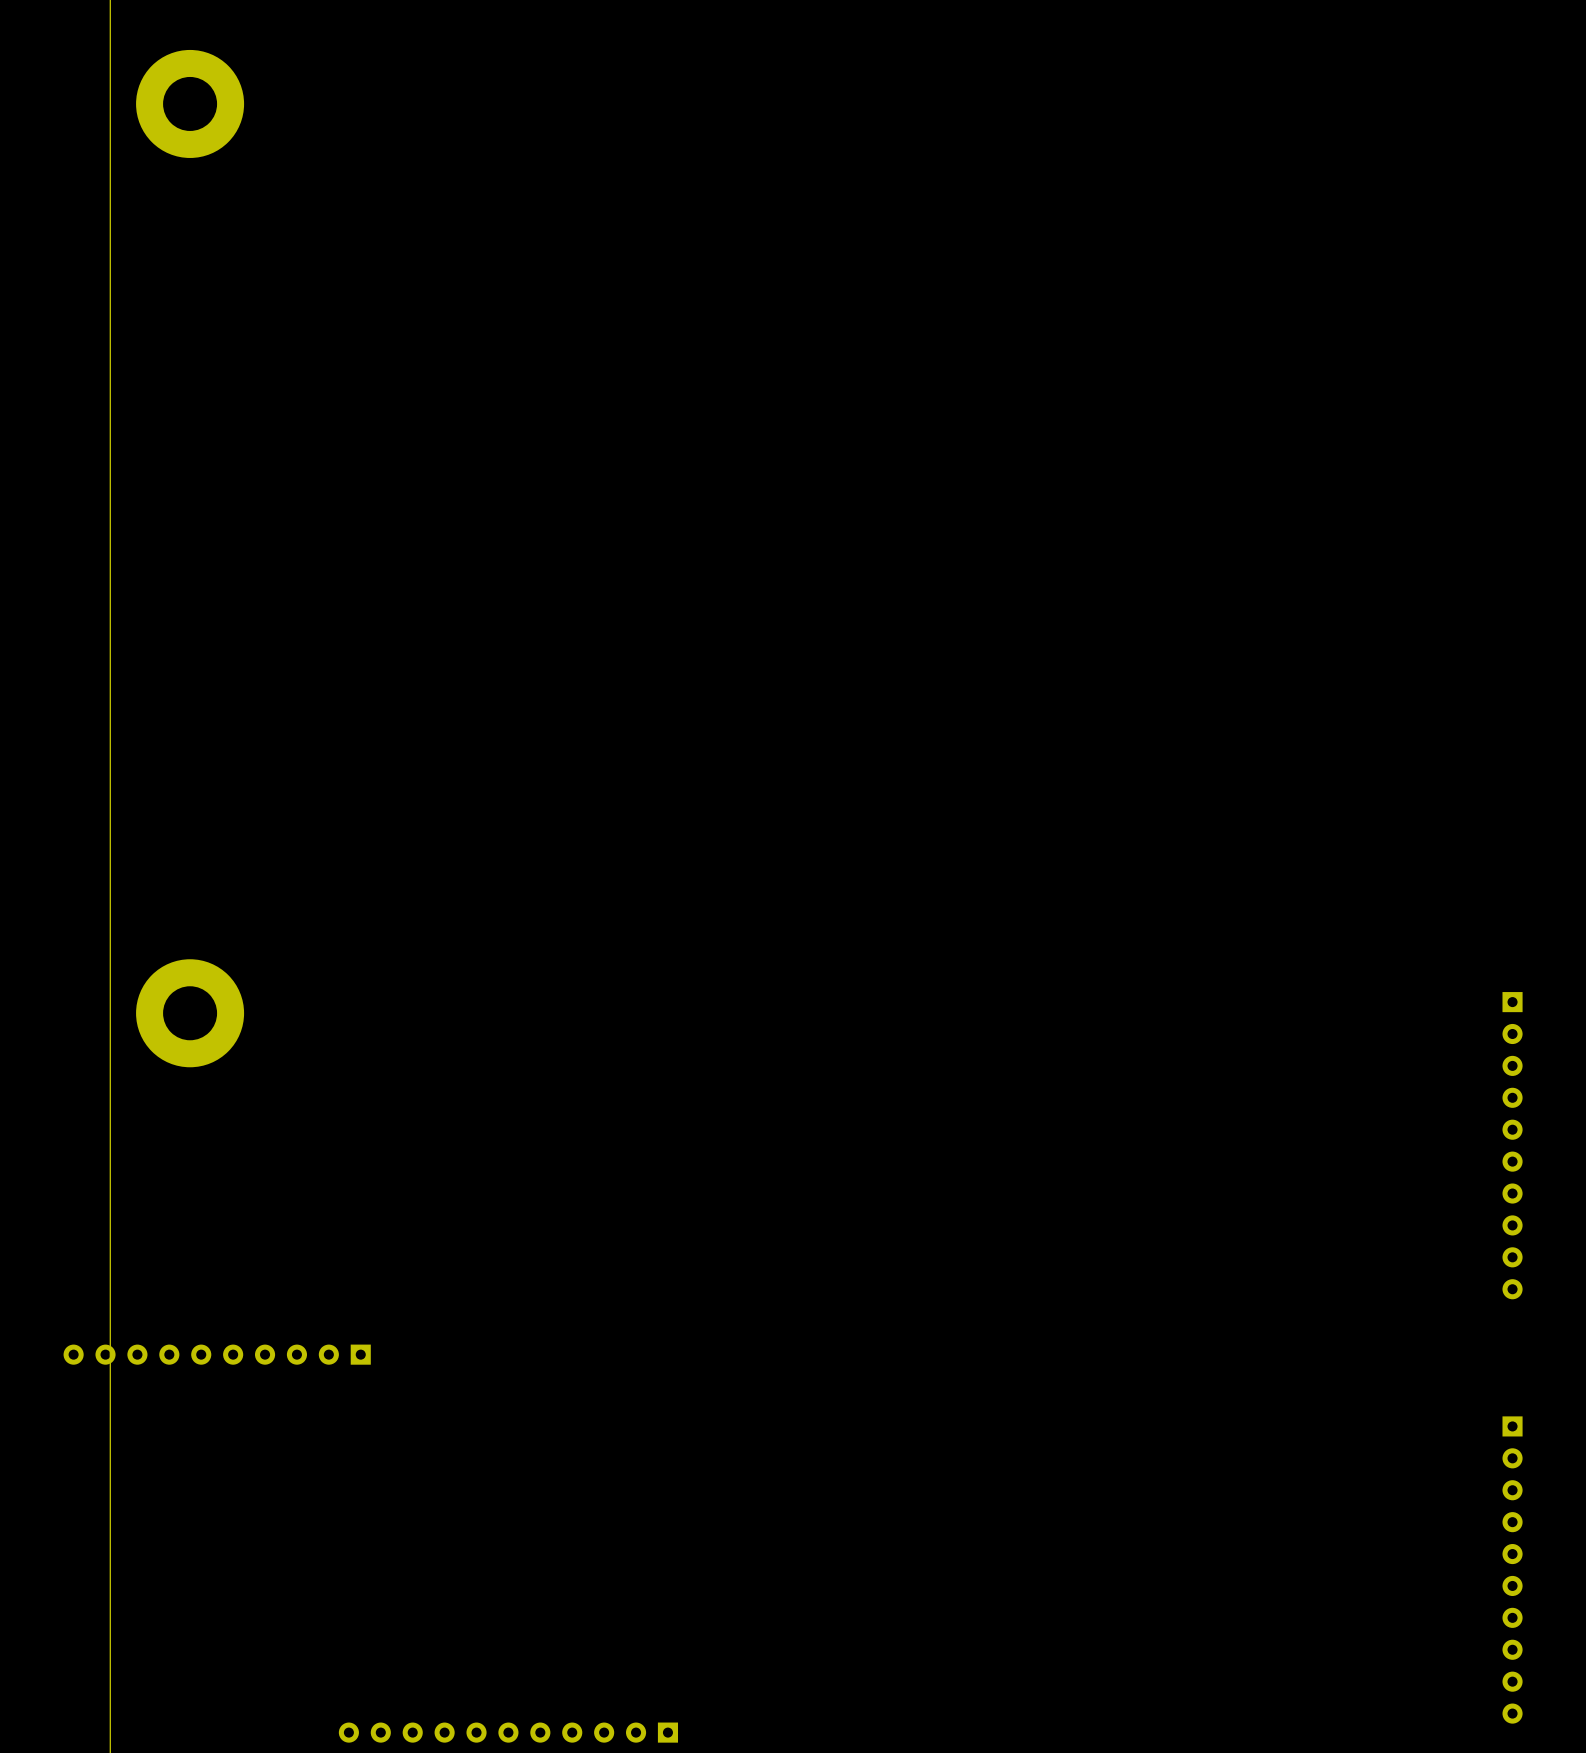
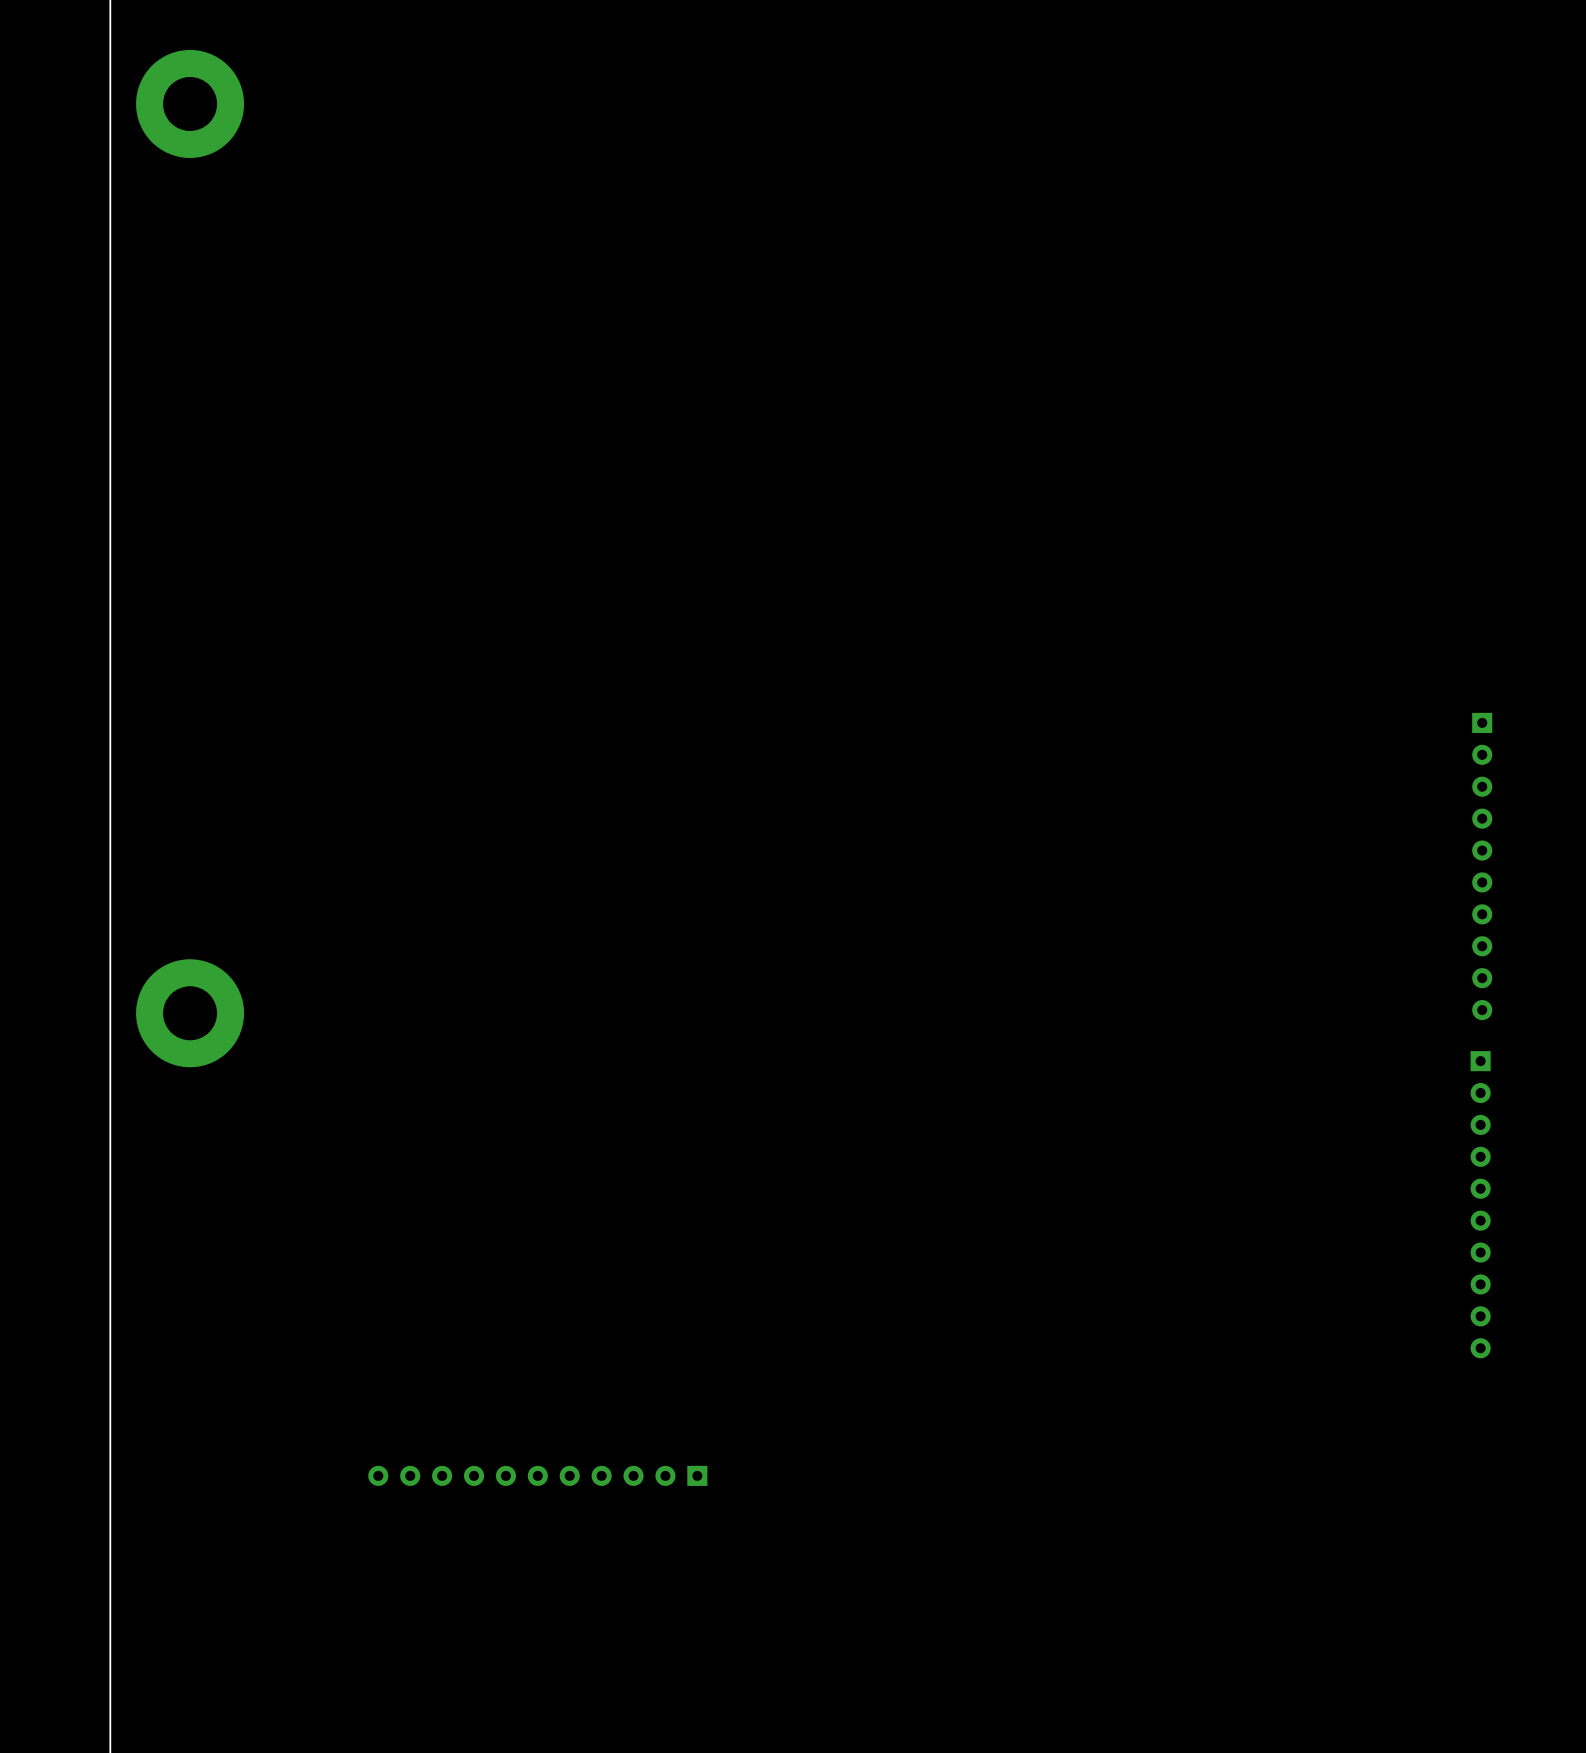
part: none -> (1482, 866)
part position: (1512, 1145) -> (1480, 1204)
part: (217, 1354) -> none
part: (1512, 1570) -> none
part position: (508, 1732) -> (537, 1475)

